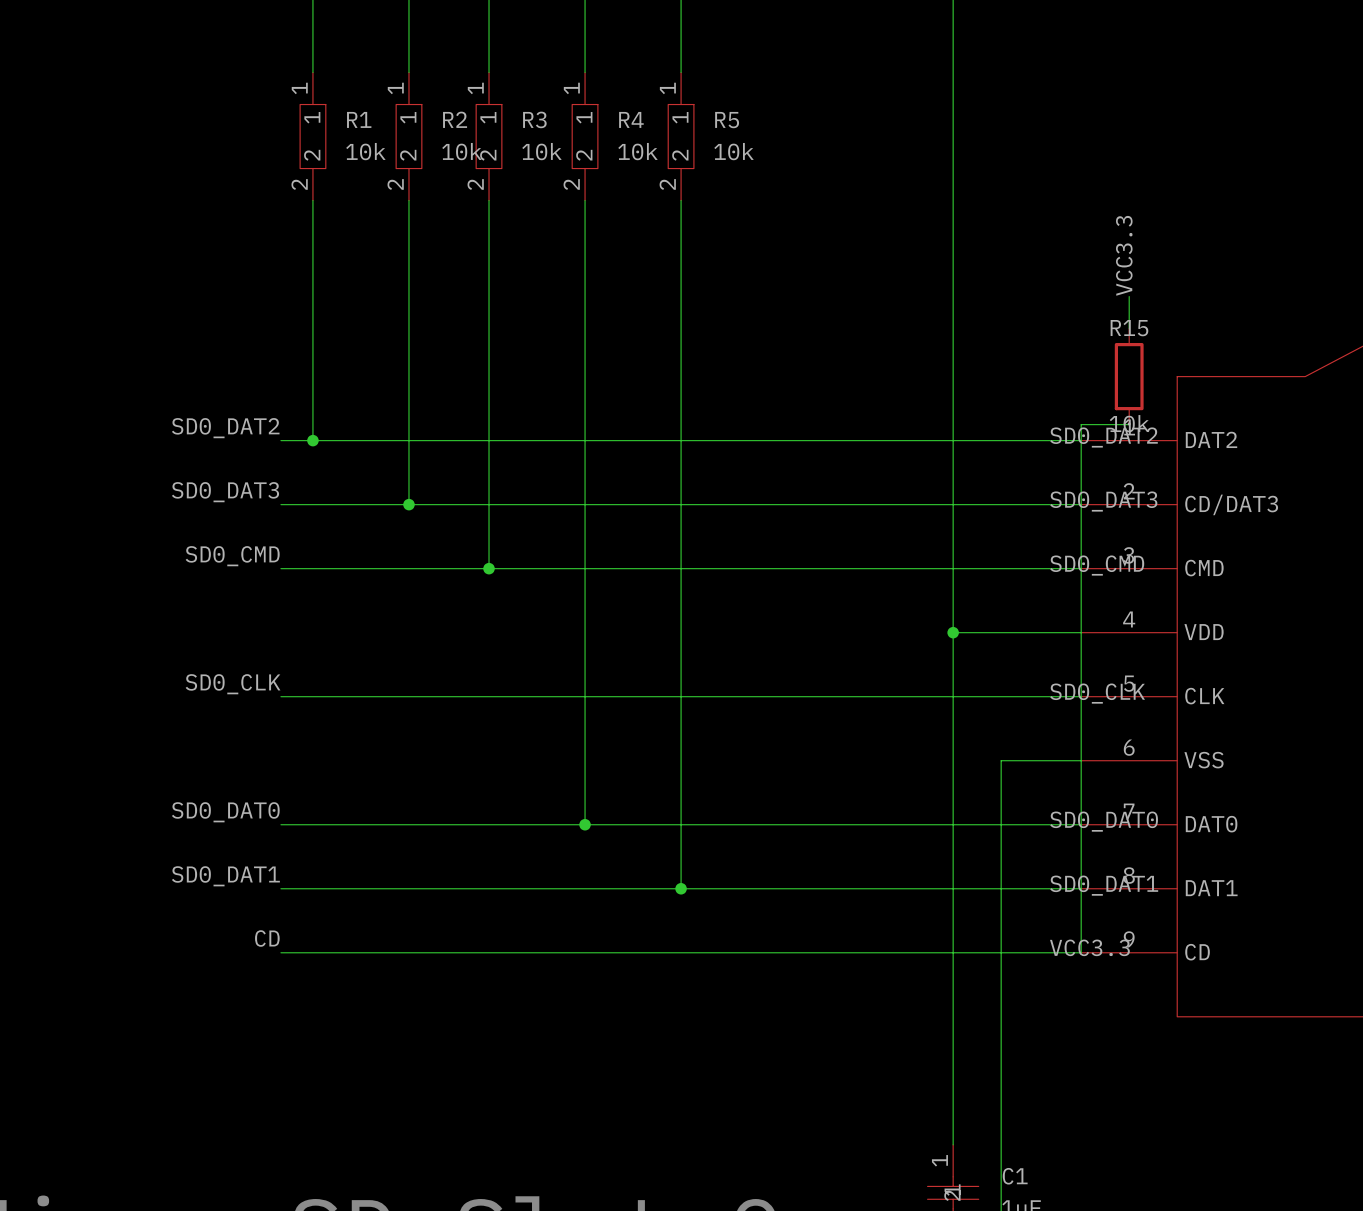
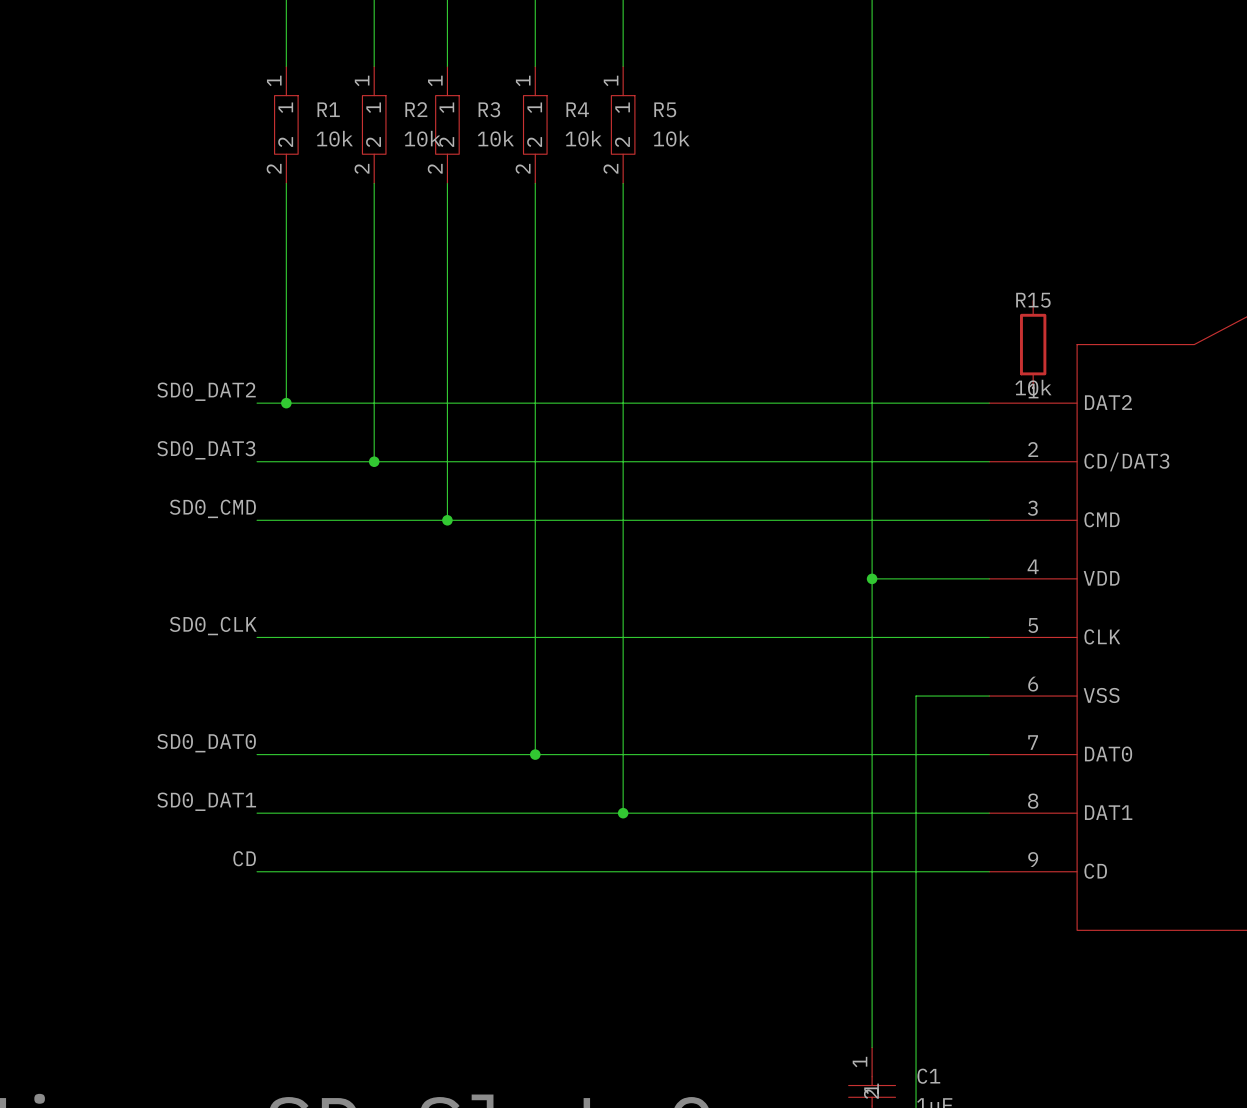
label: VCC3.3 (1124, 255) -> none
wire: (1129, 296) (1129, 328) -> none
wire: (1129, 424) (1081, 424) (1081, 952) -> none
label: SD0_DAT2 (1104, 437) -> none
label: SD0_DAT3 (1103, 501) -> none
label: SD0_CMD (1097, 565) -> none
label: SD0_CLK (1097, 693) -> none
label: SD0_DAT0 (1104, 821) -> none
label: SD0_DAT1 (1104, 885) -> none
label: VCC3.3 (1089, 947) -> none

